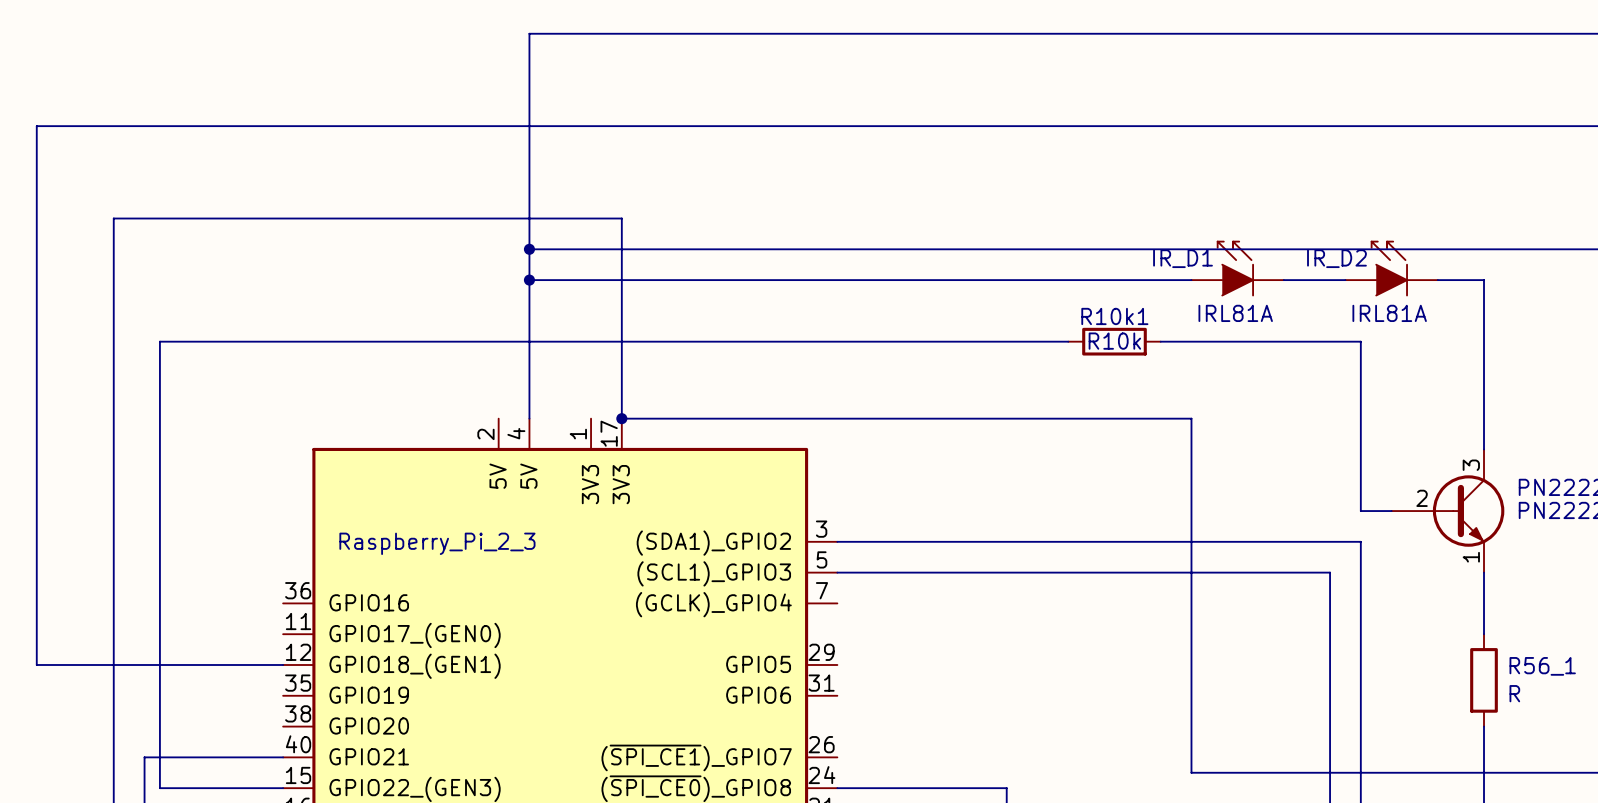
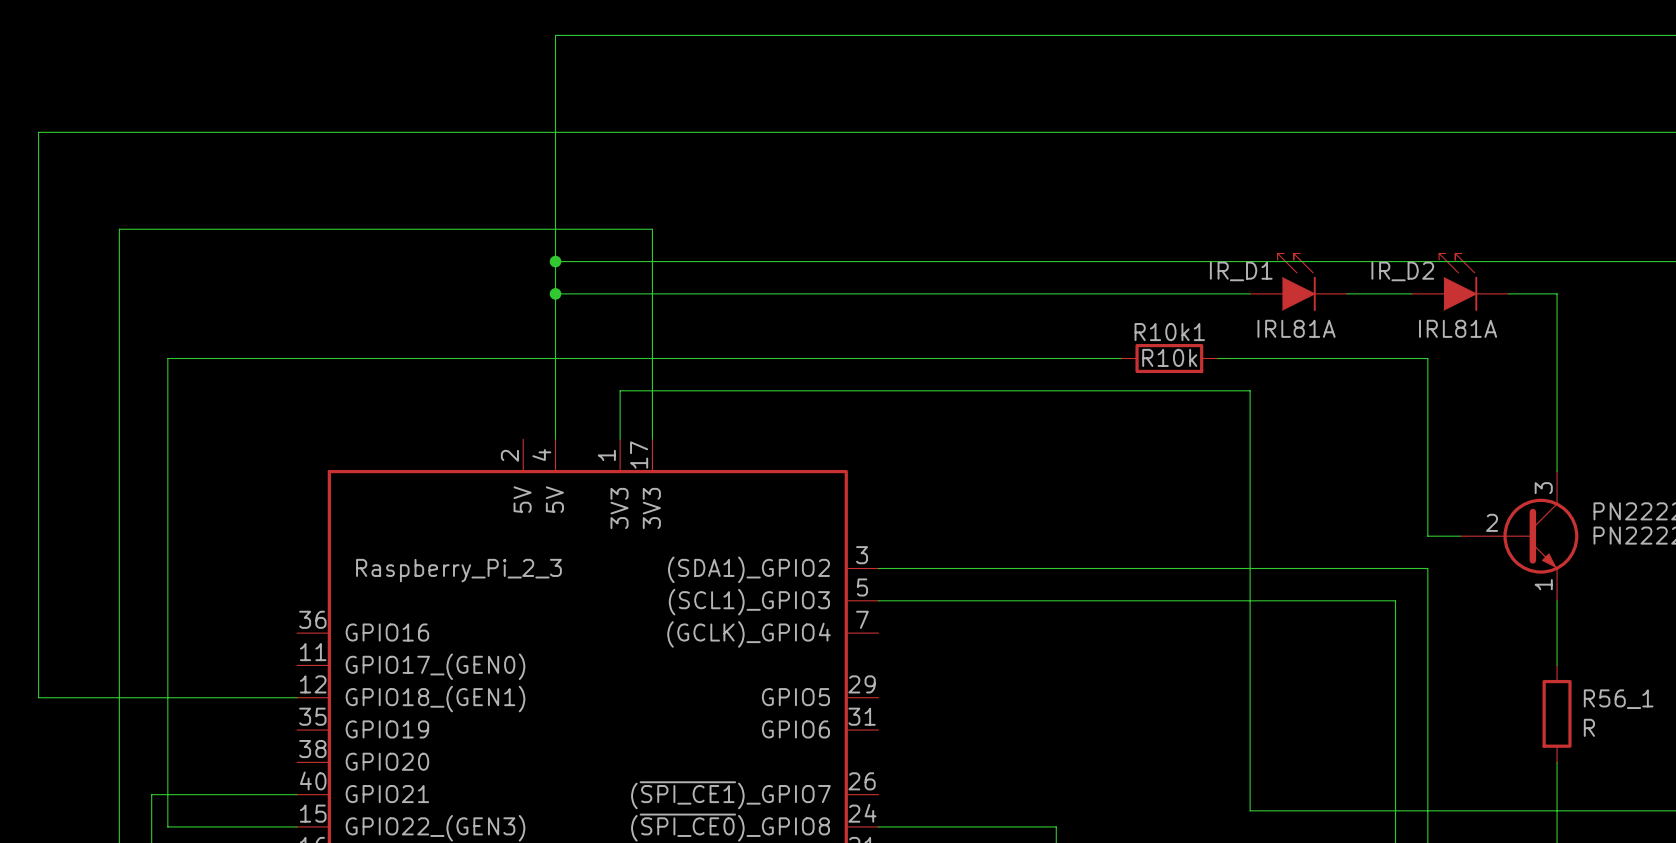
wire: (621, 418) (1191, 418) -> (620, 439) (620, 390) (1250, 390) (1250, 439)
junction: (621, 418) -> none

